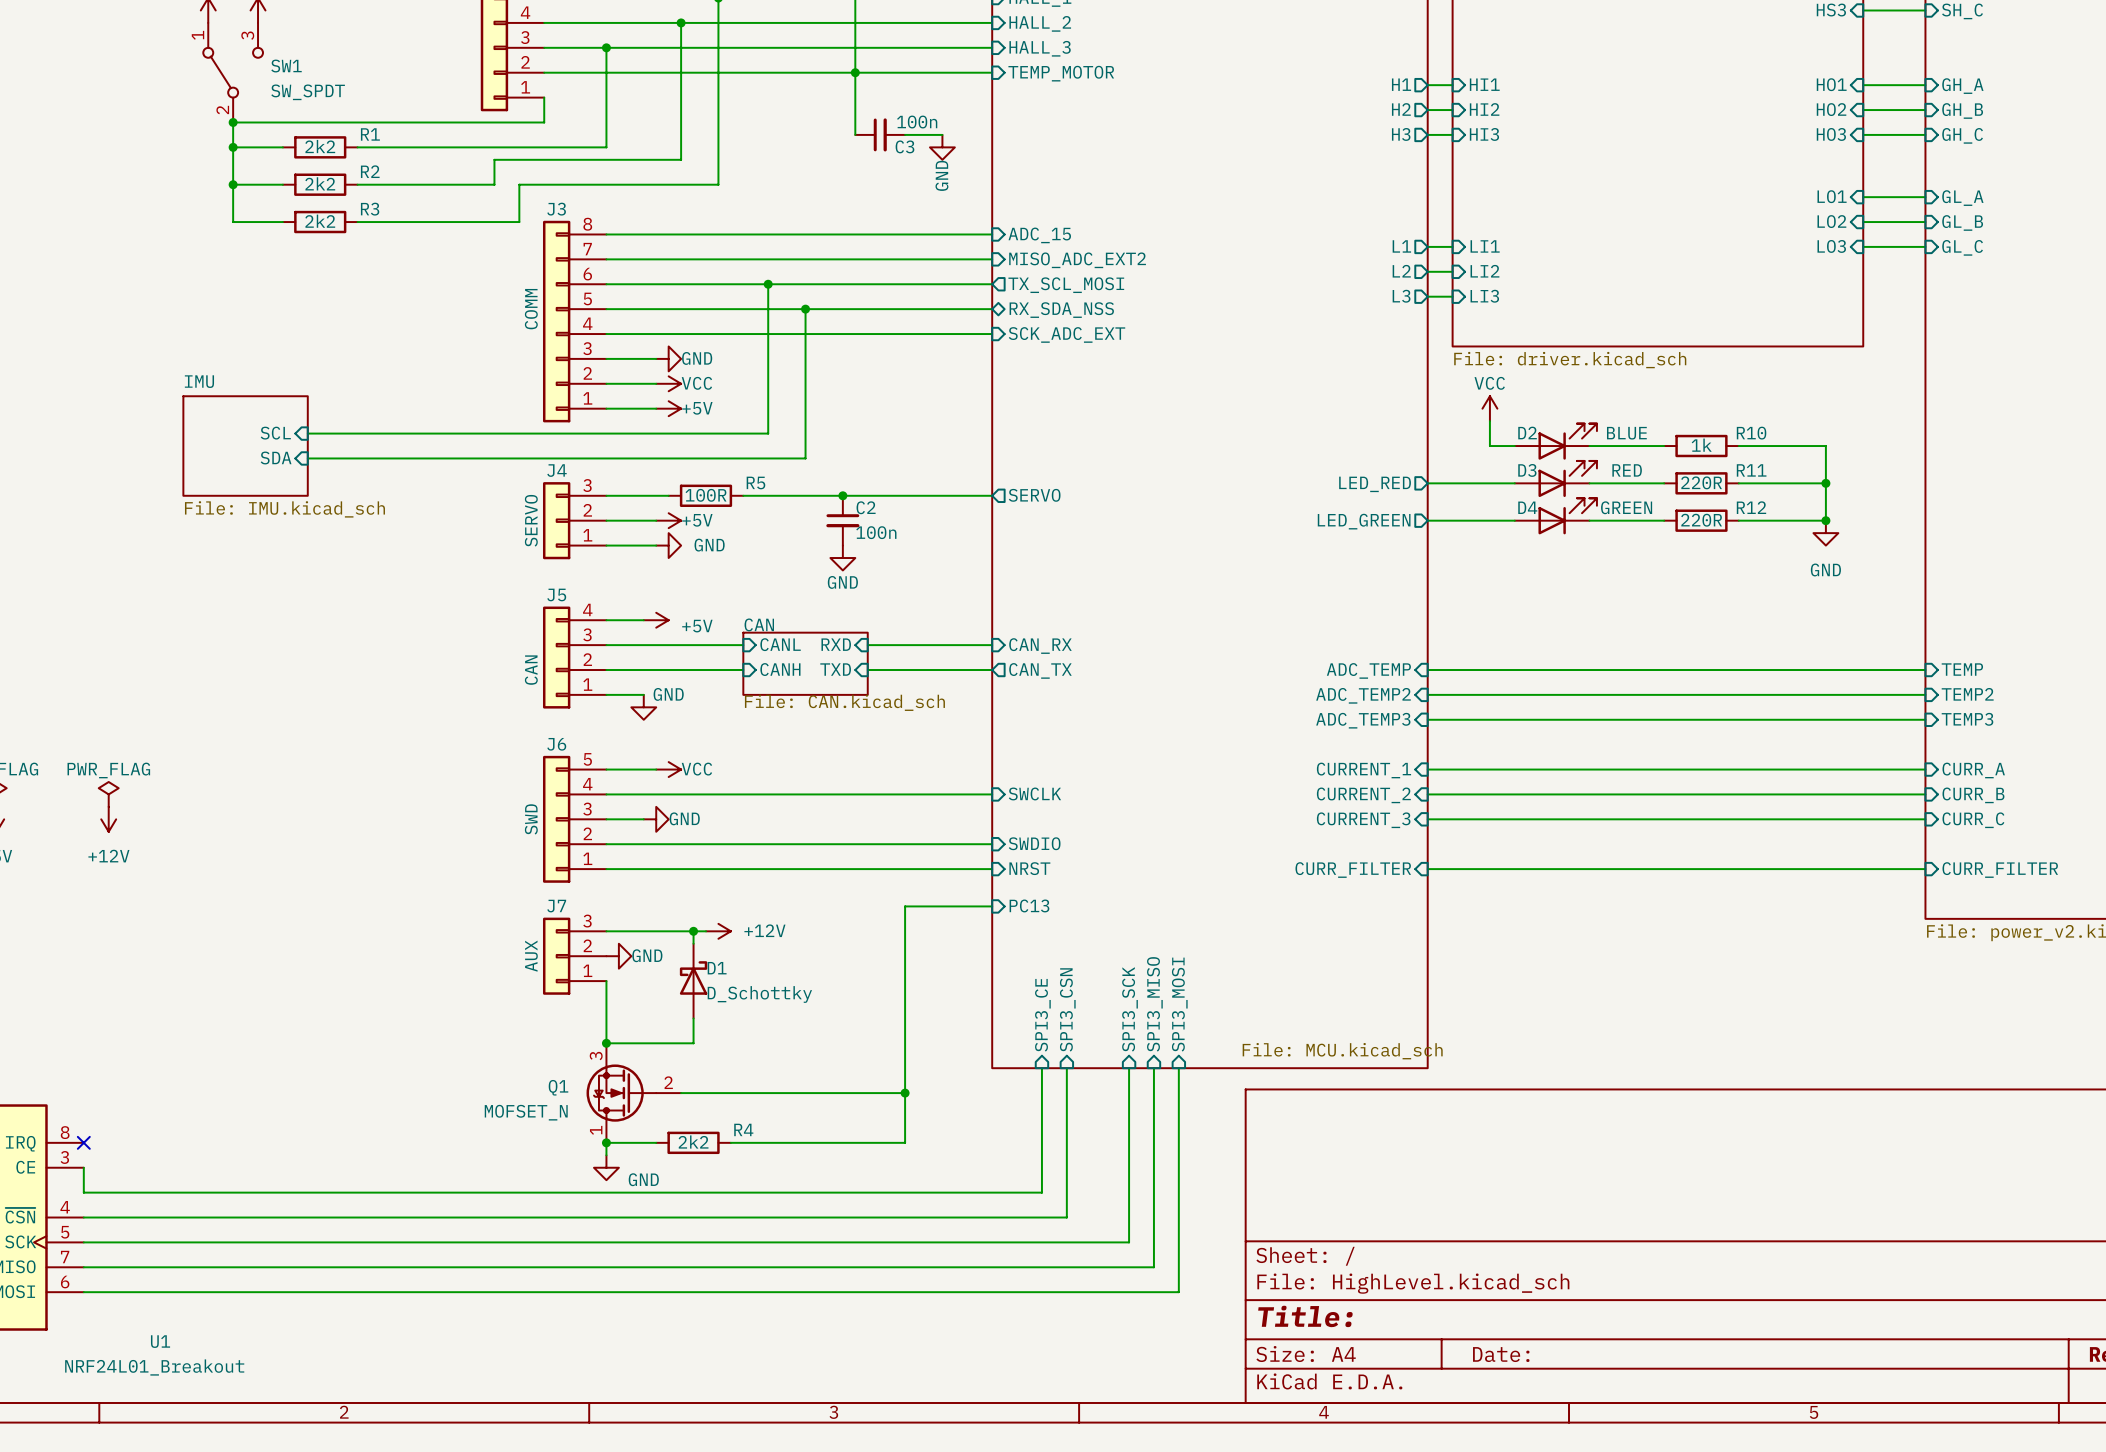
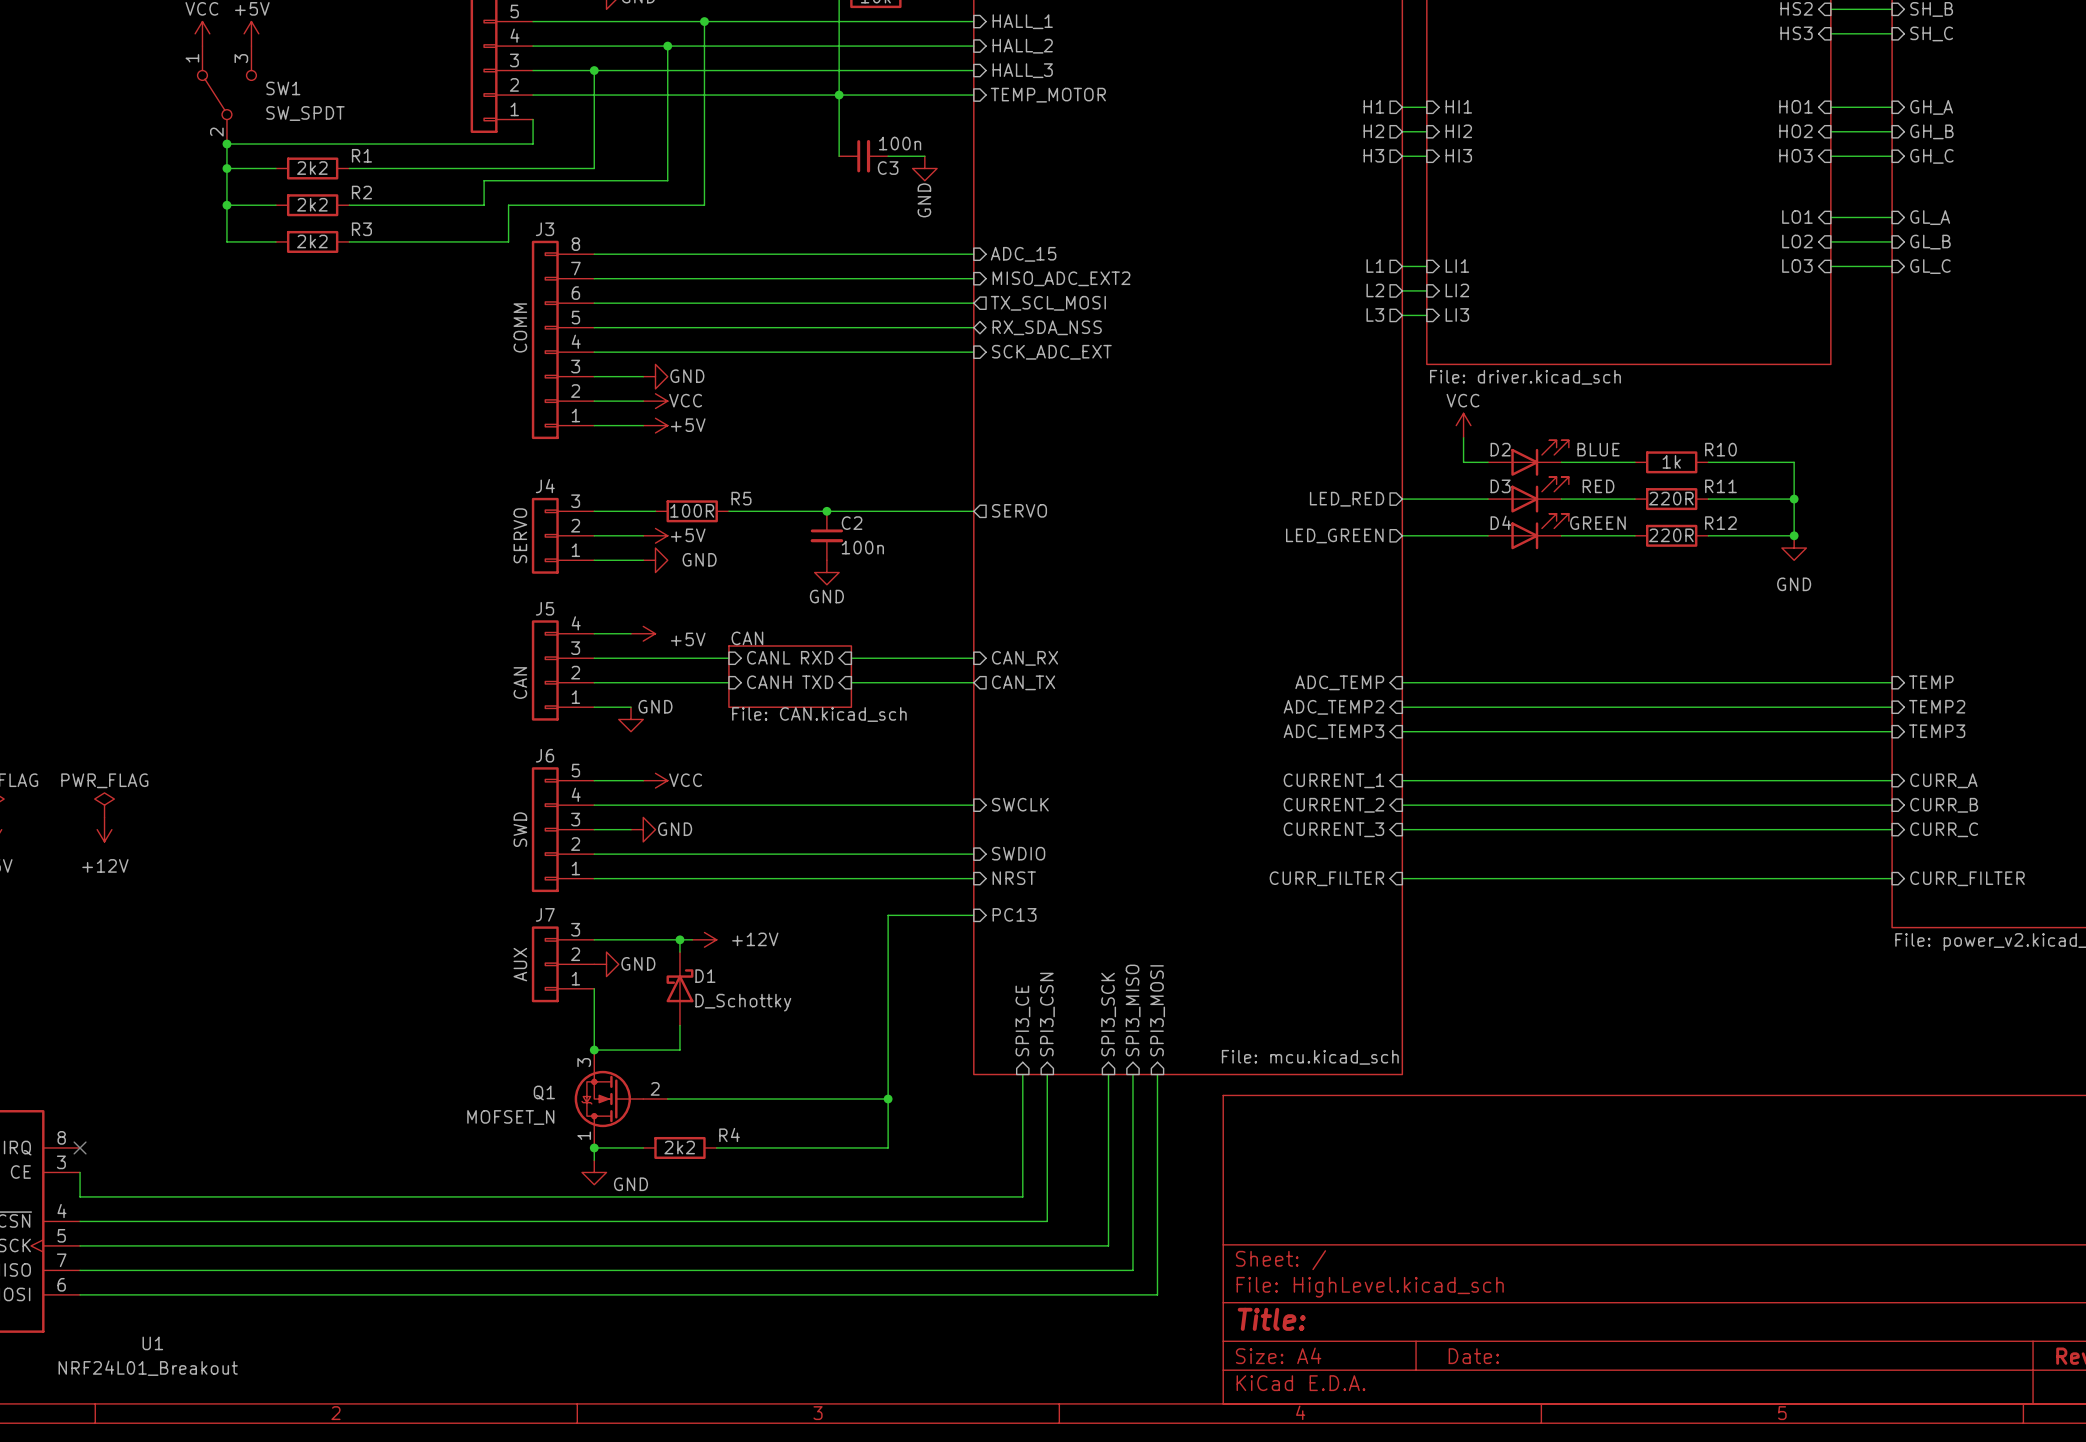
wire: (768, 284) (768, 433) (307, 433) -> none
junction: (768, 284) -> none
wire: (805, 309) (805, 458) (307, 458) -> none
junction: (805, 309) -> none
sheet pin: SCL (275, 433) -> none
sheet IMU: File: IMU.kicad_sch (245, 446) -> none
sheet pin: SDA (276, 457) -> none
sheet value: File: MCU.kicad_sch (1342, 1051) -> File: mcu.kicad_sch (1310, 1057)

